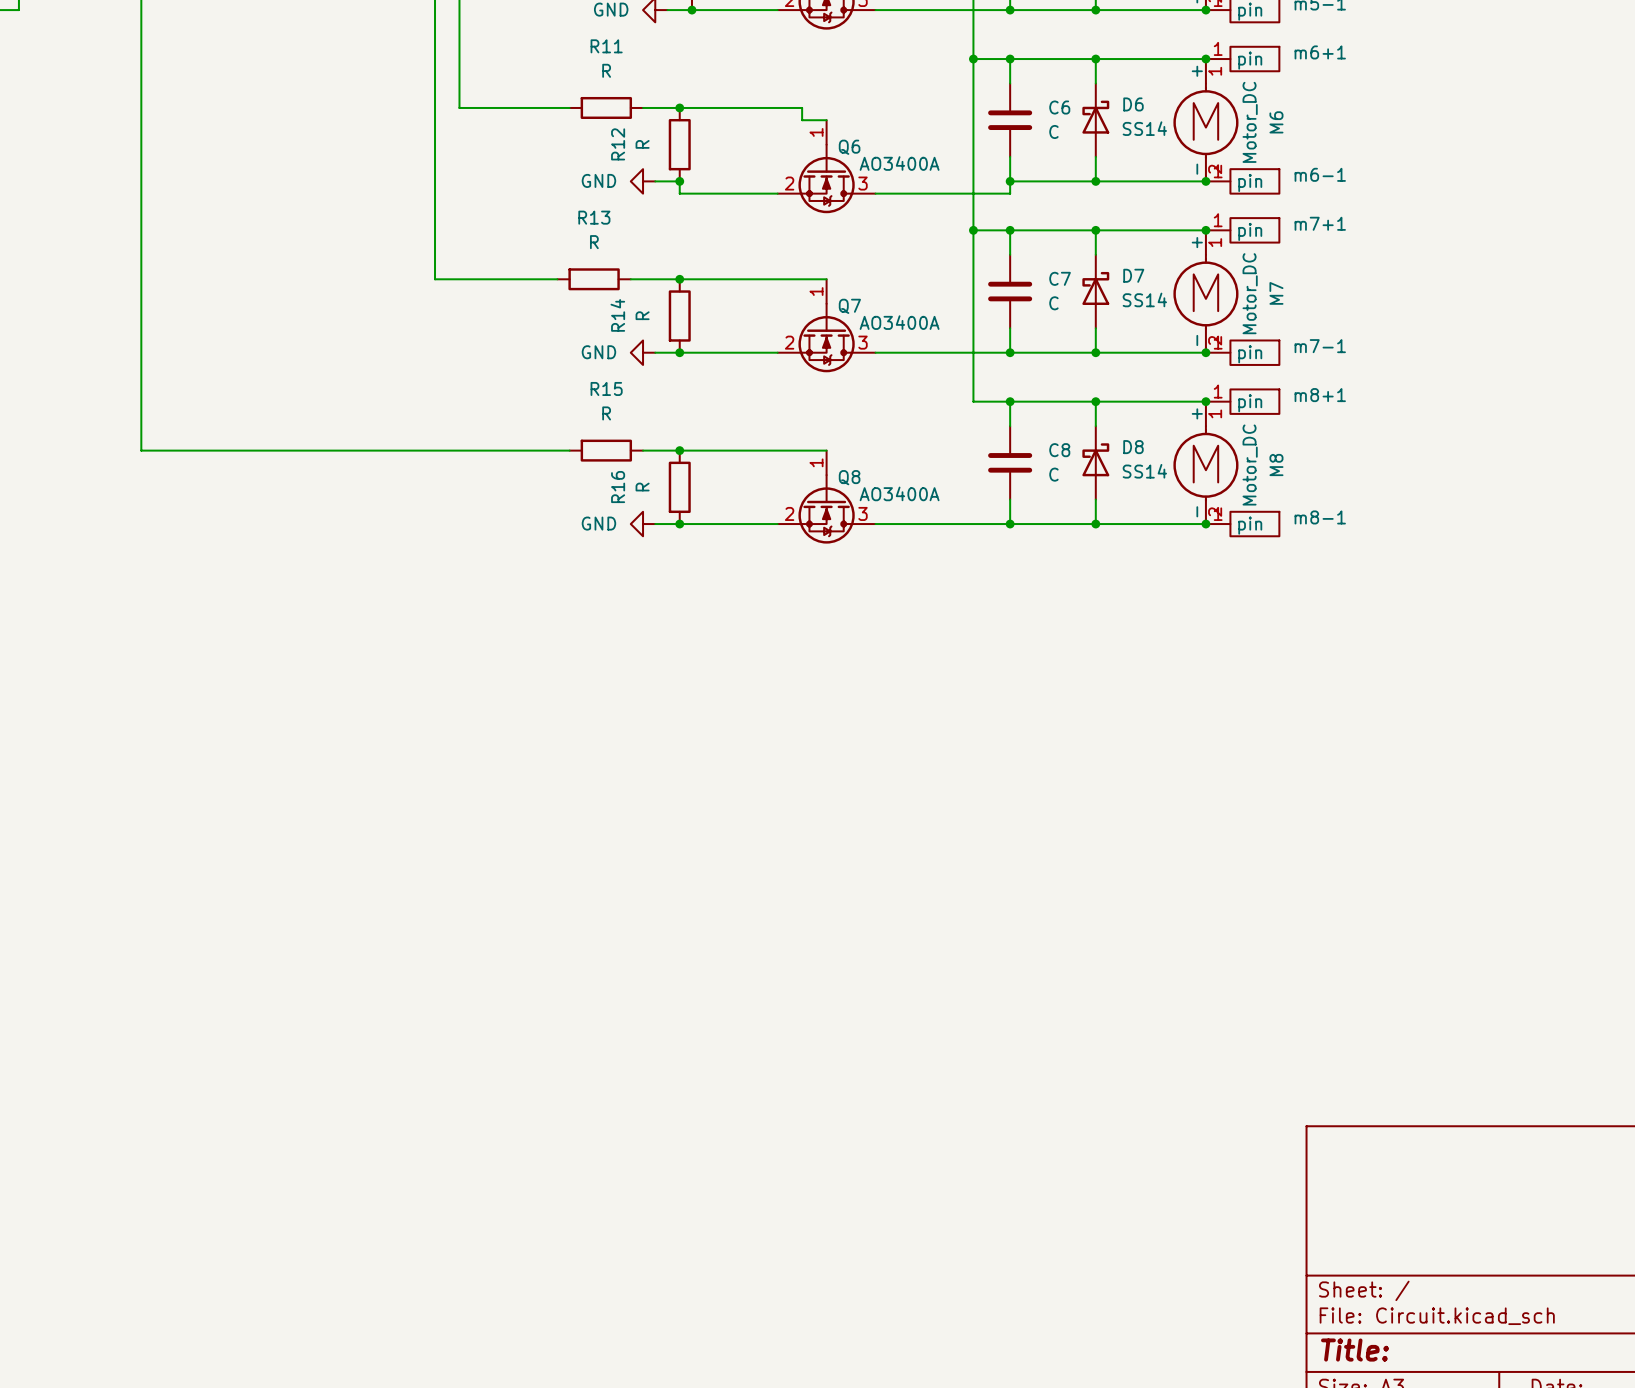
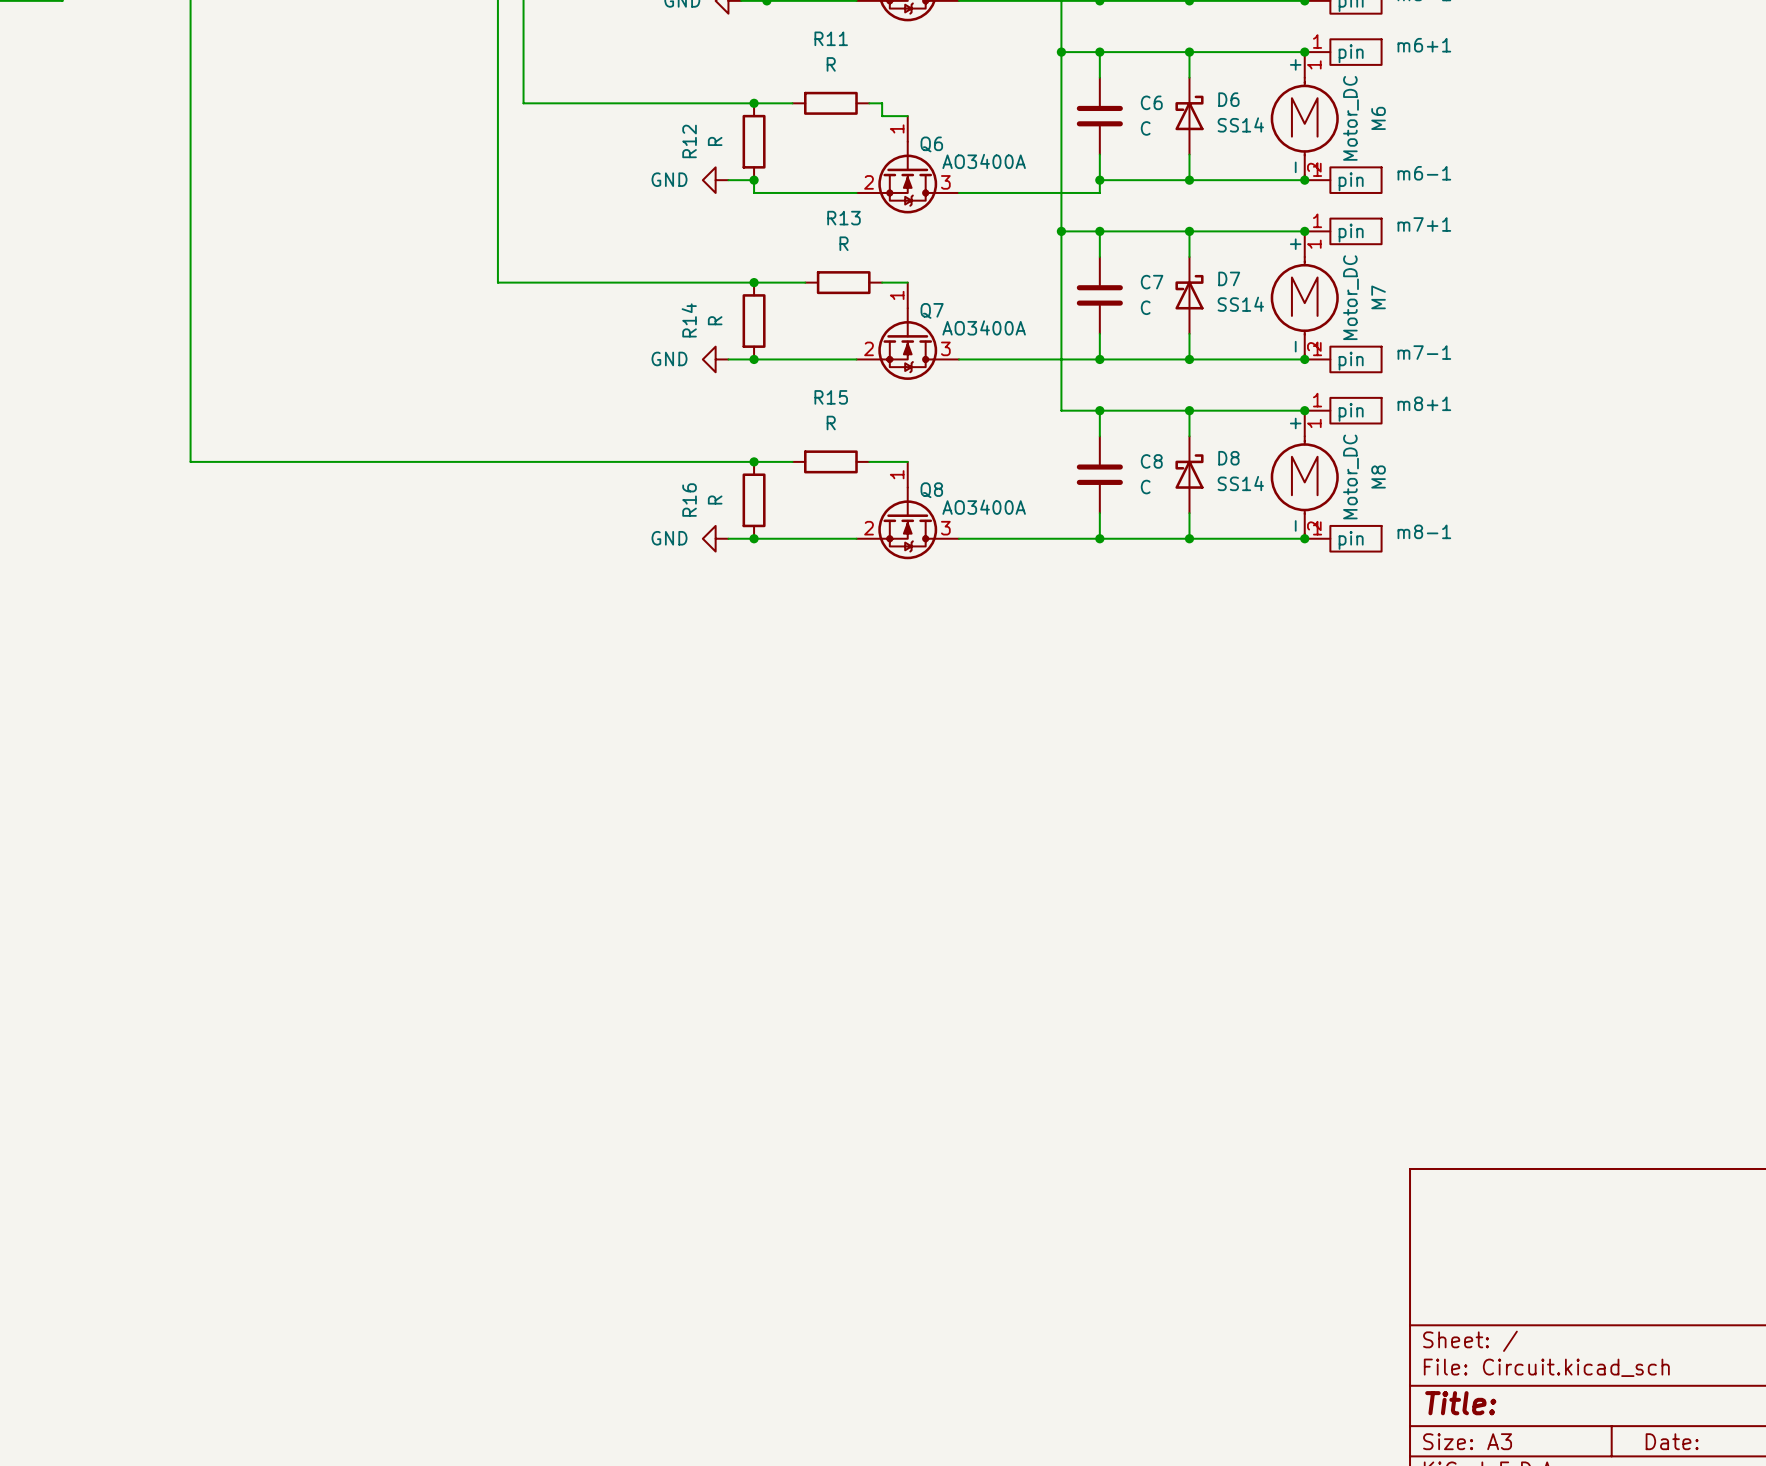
R11 position: (606, 107) -> (830, 103)
wire: (716, 107) (789, 107) -> (638, 103) (715, 103)
R13 position: (594, 279) -> (843, 282)
wire: (728, 279) (802, 279) -> (626, 282) (702, 282)
R15 position: (606, 450) -> (830, 461)
wire: (716, 450) (789, 450) -> (638, 461) (715, 461)

